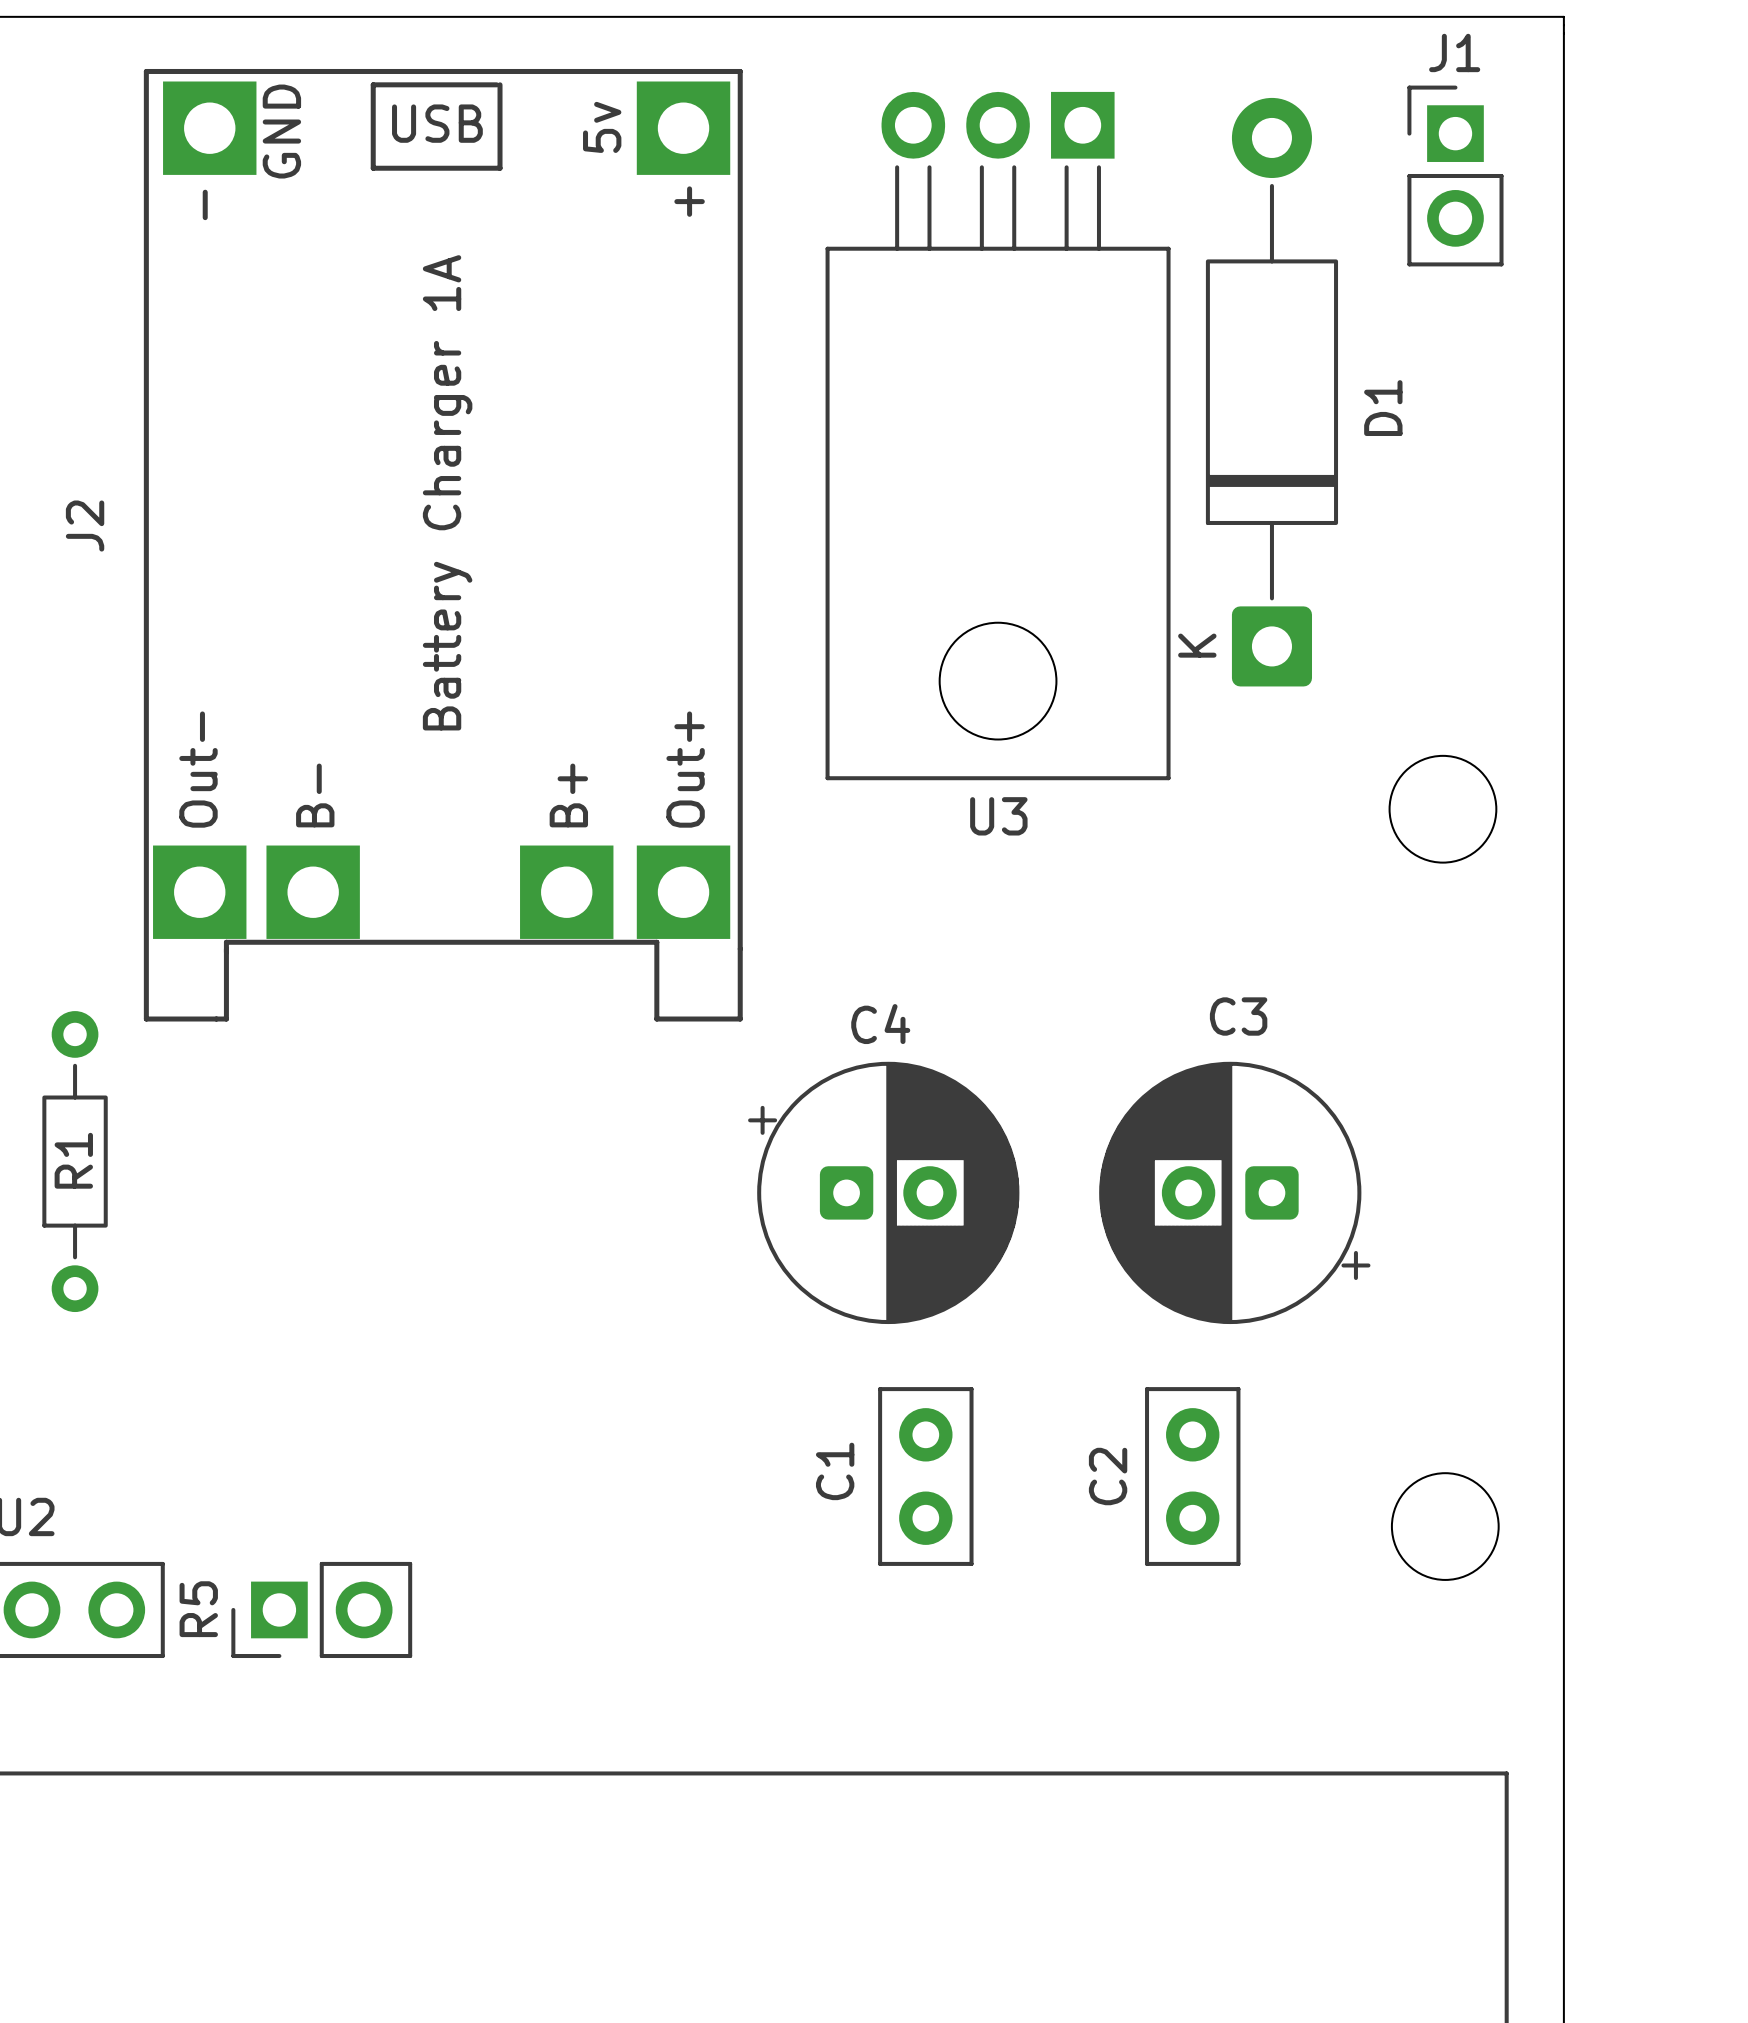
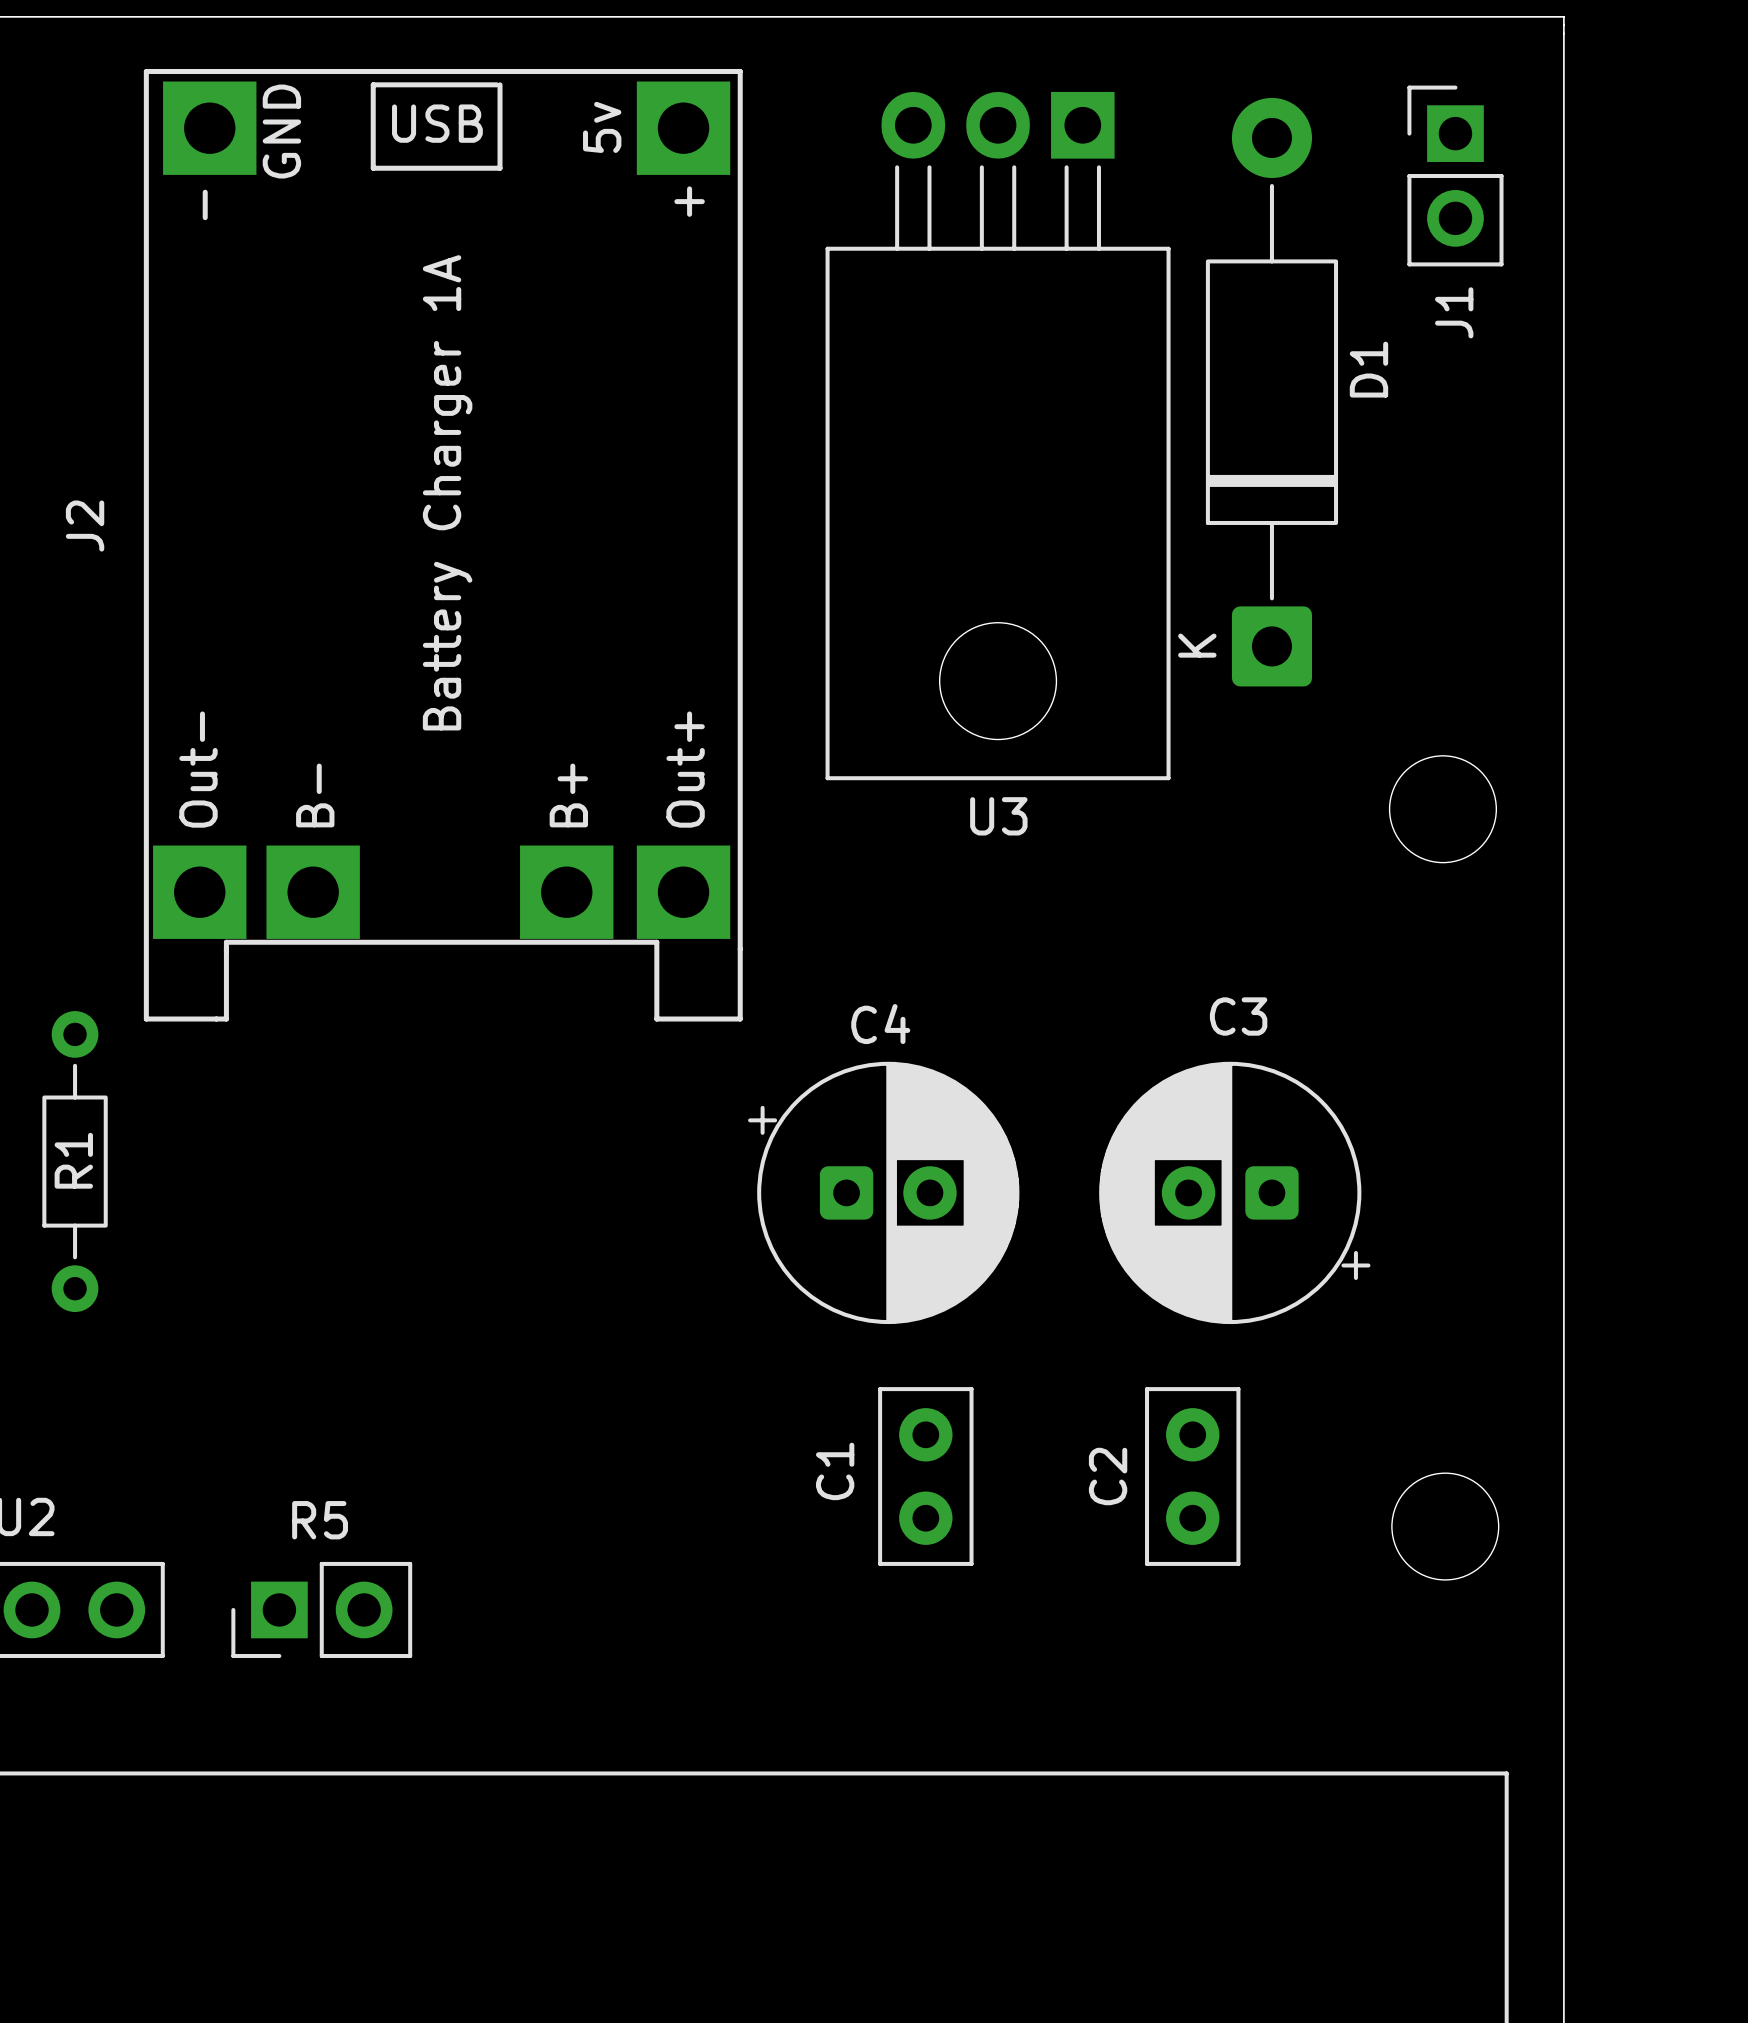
J1 name rotation: 0° (1454, 52) -> 90° counterclockwise (1454, 312)
J1 name position: J1 (1454, 52) -> J1 (1454, 312)
D1 name position: D1 (1383, 408) -> D1 (1368, 369)
R5 name rotation: 0° (198, 1609) -> 90° clockwise (320, 1520)
R5 name position: R5 (198, 1609) -> R5 (320, 1520)

